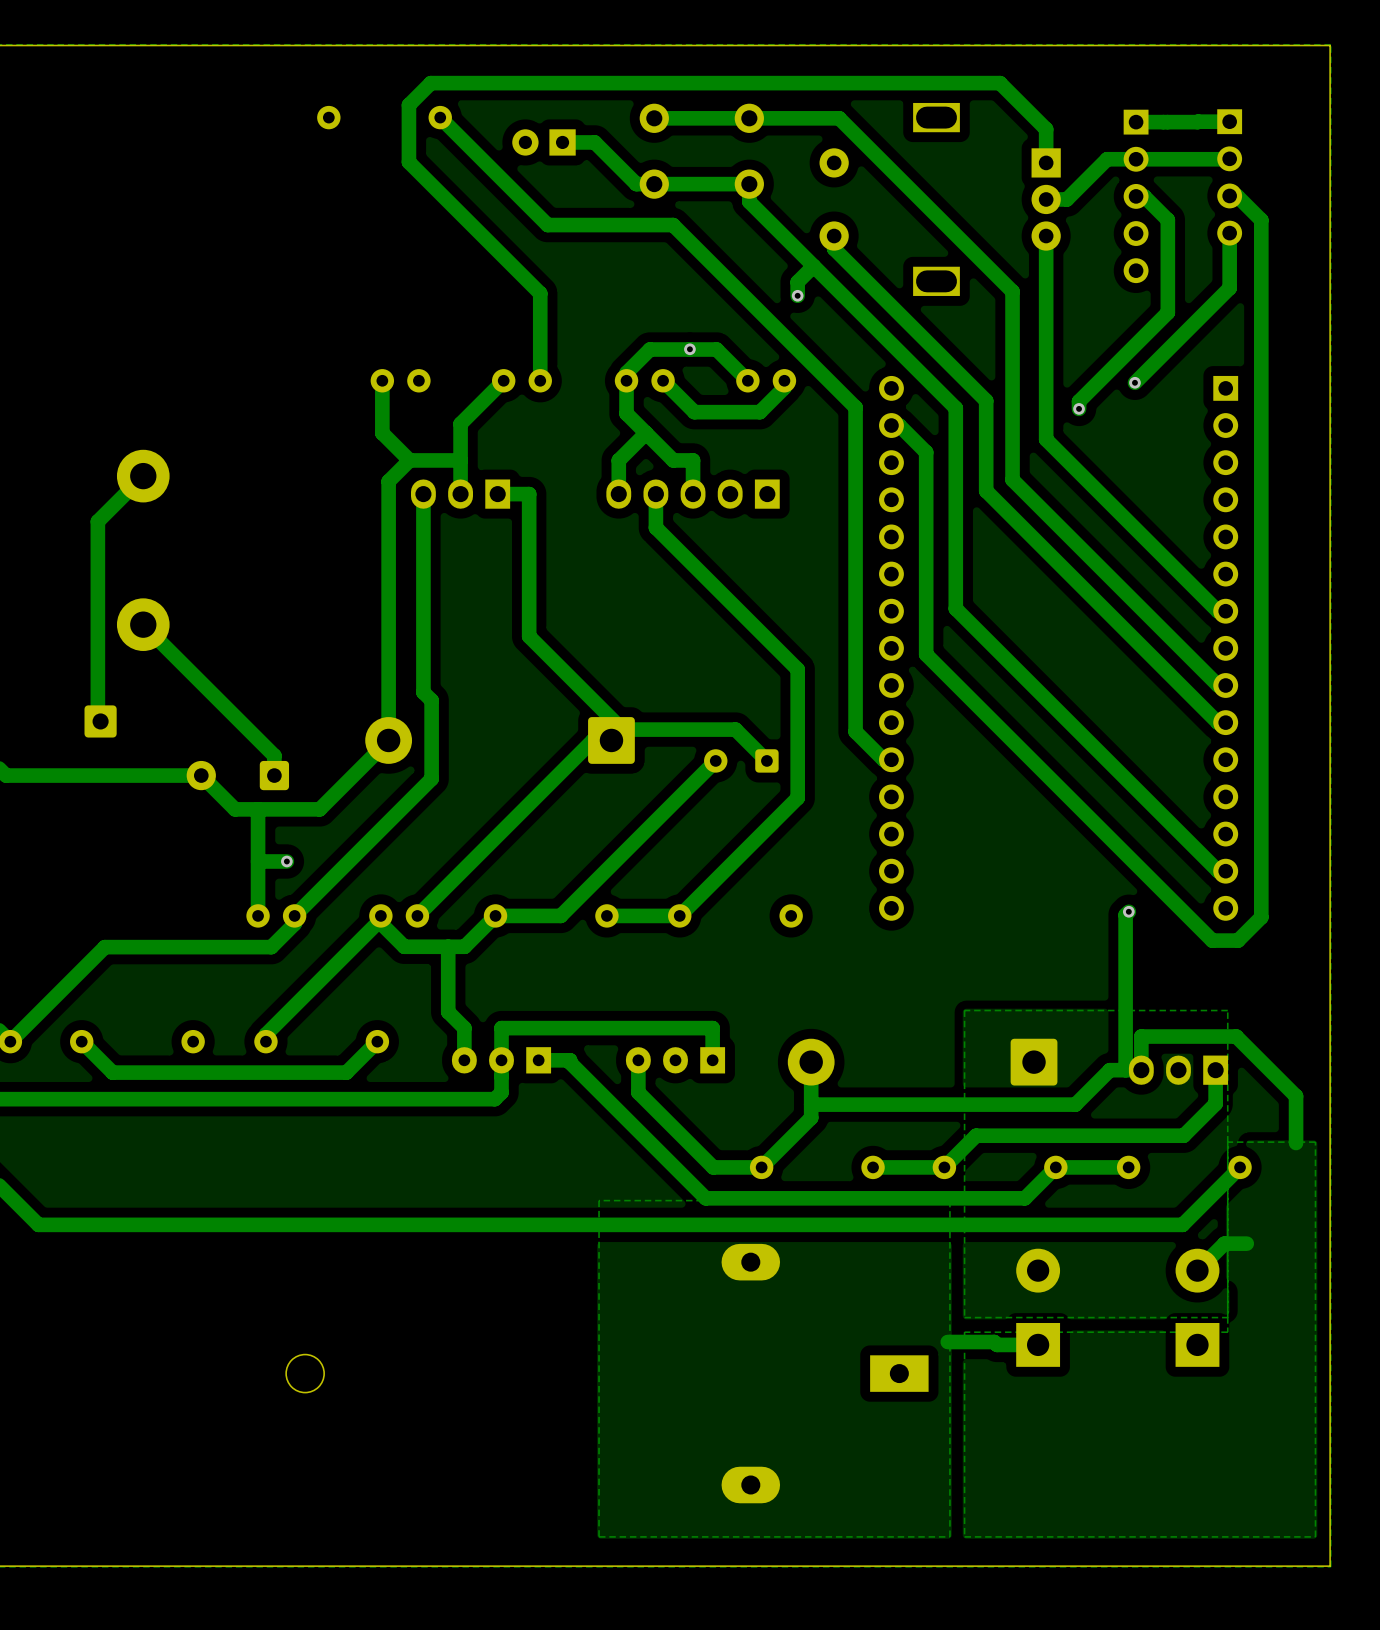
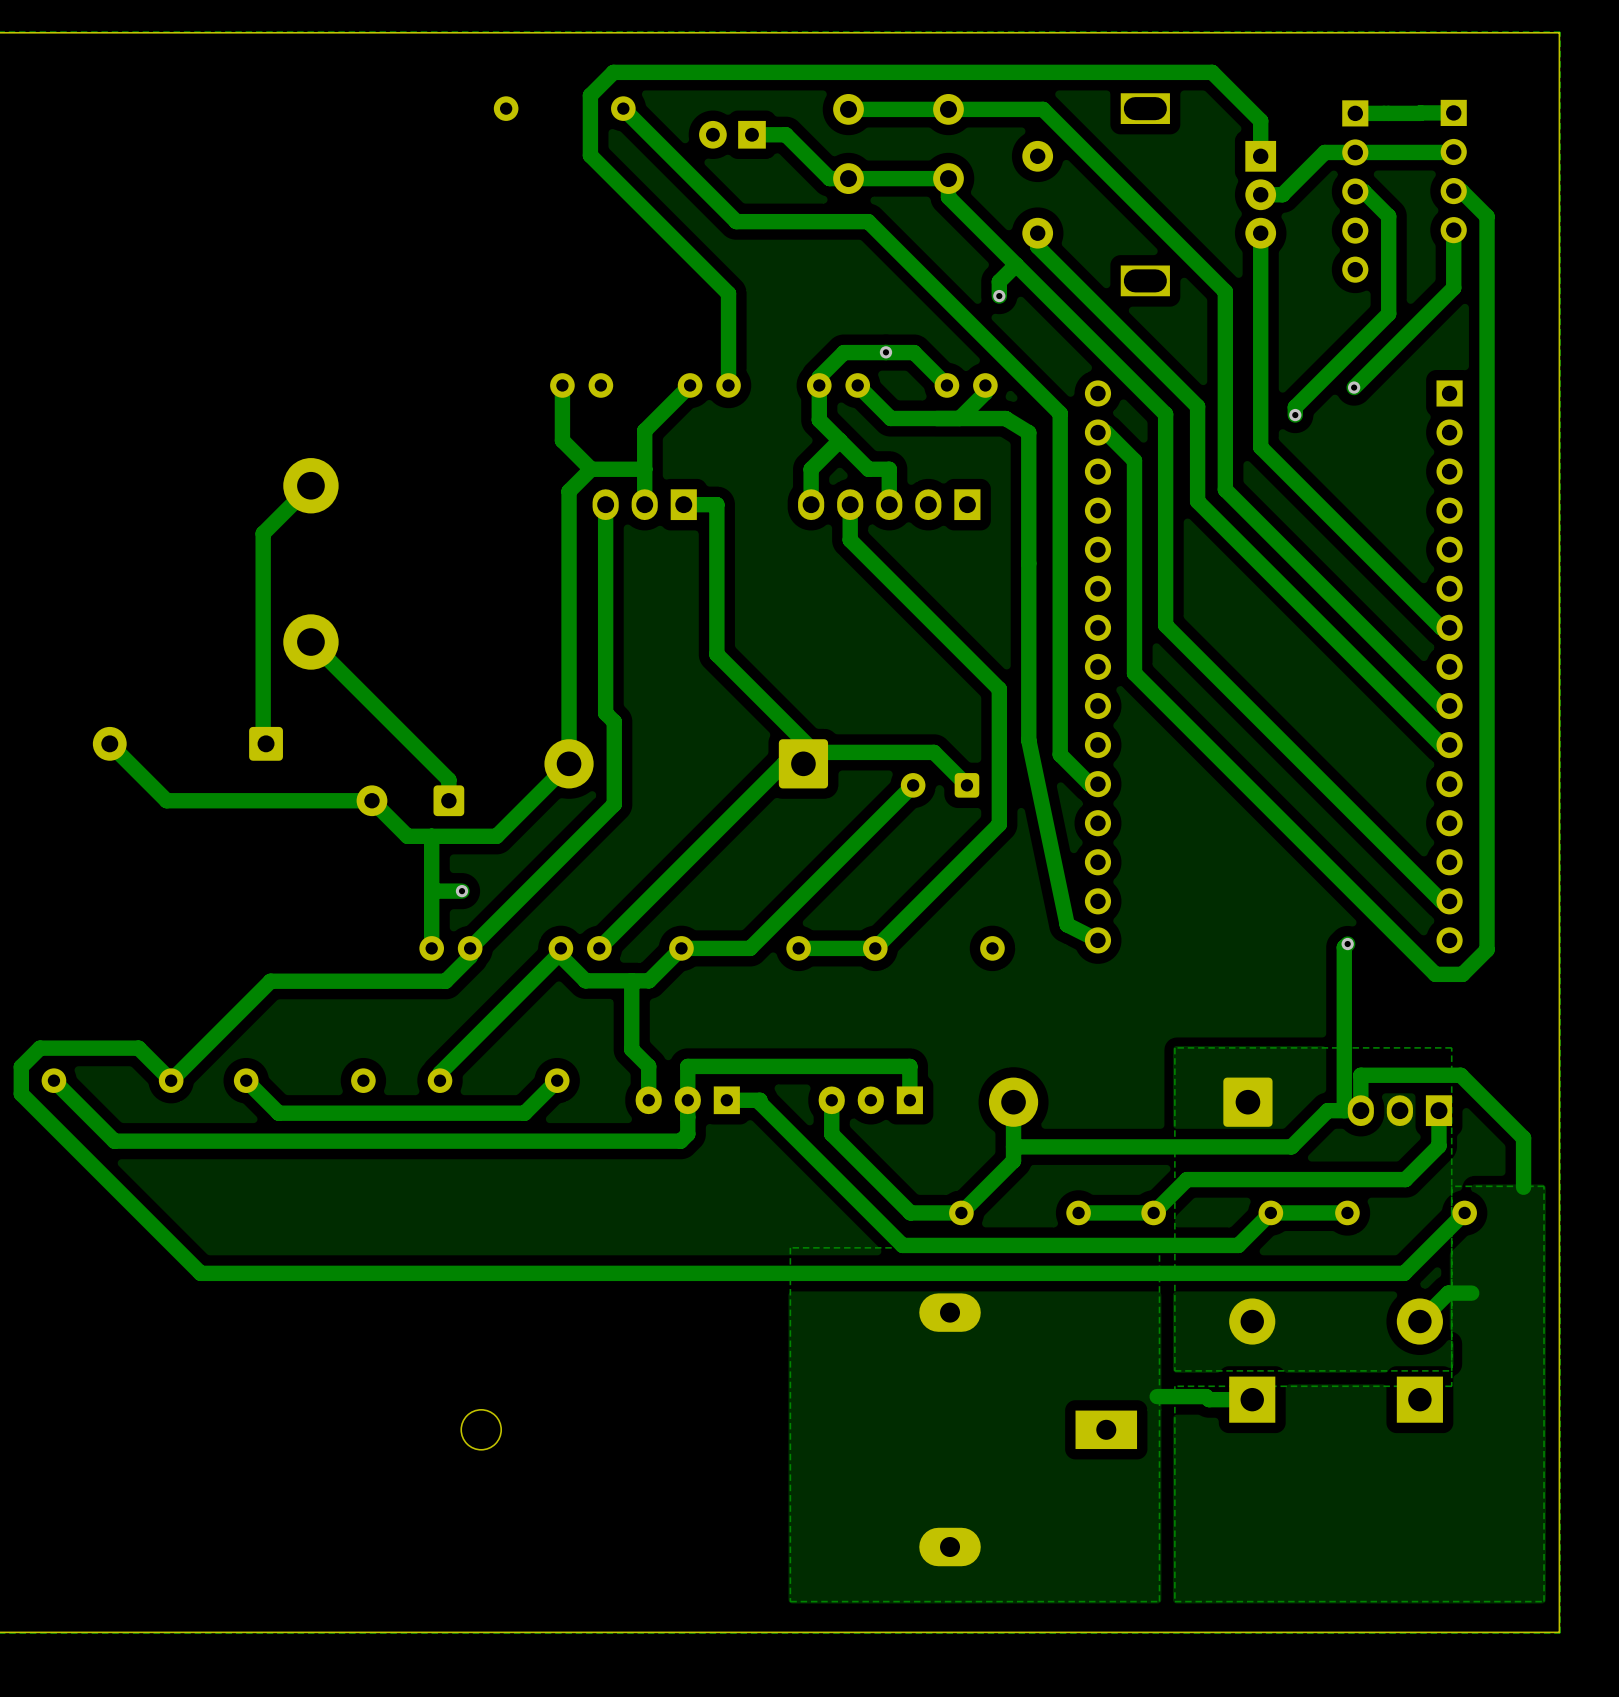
track: none -> (959, 418) (1005, 418) (1028, 432) (1028, 740) (1067, 924) (1097, 940)

